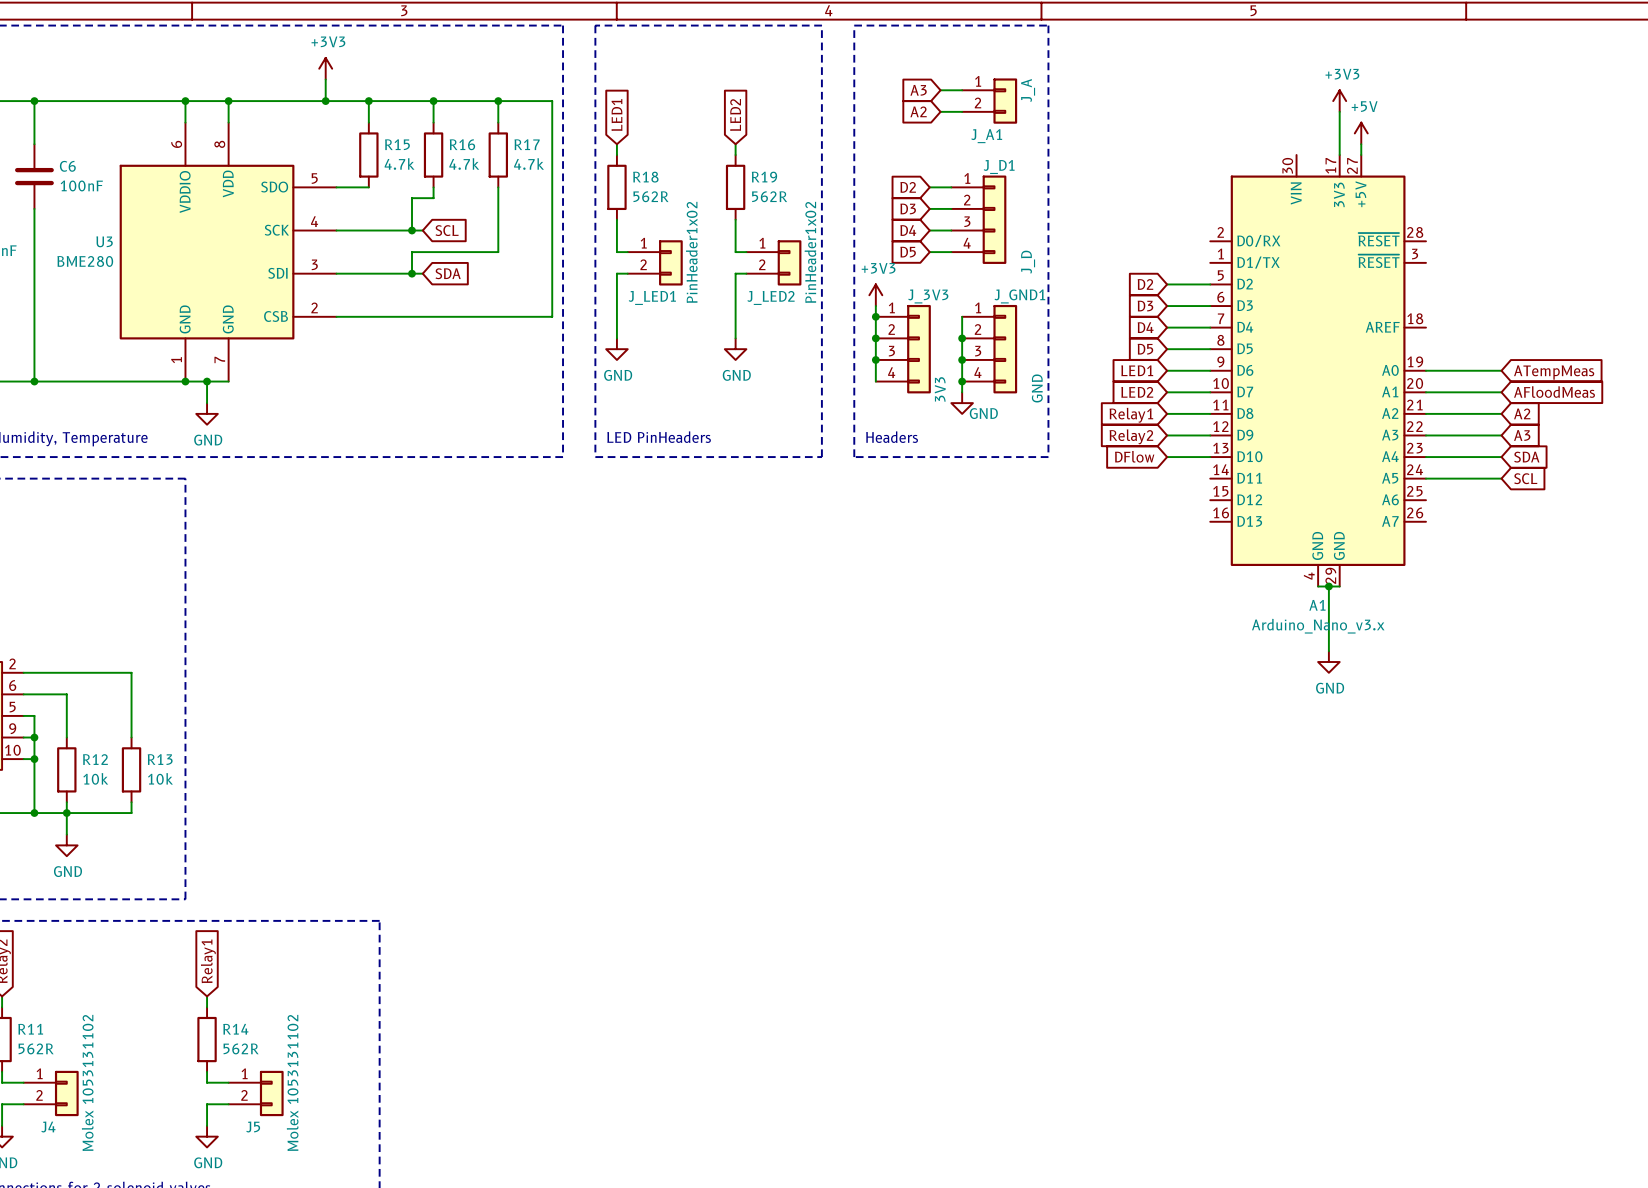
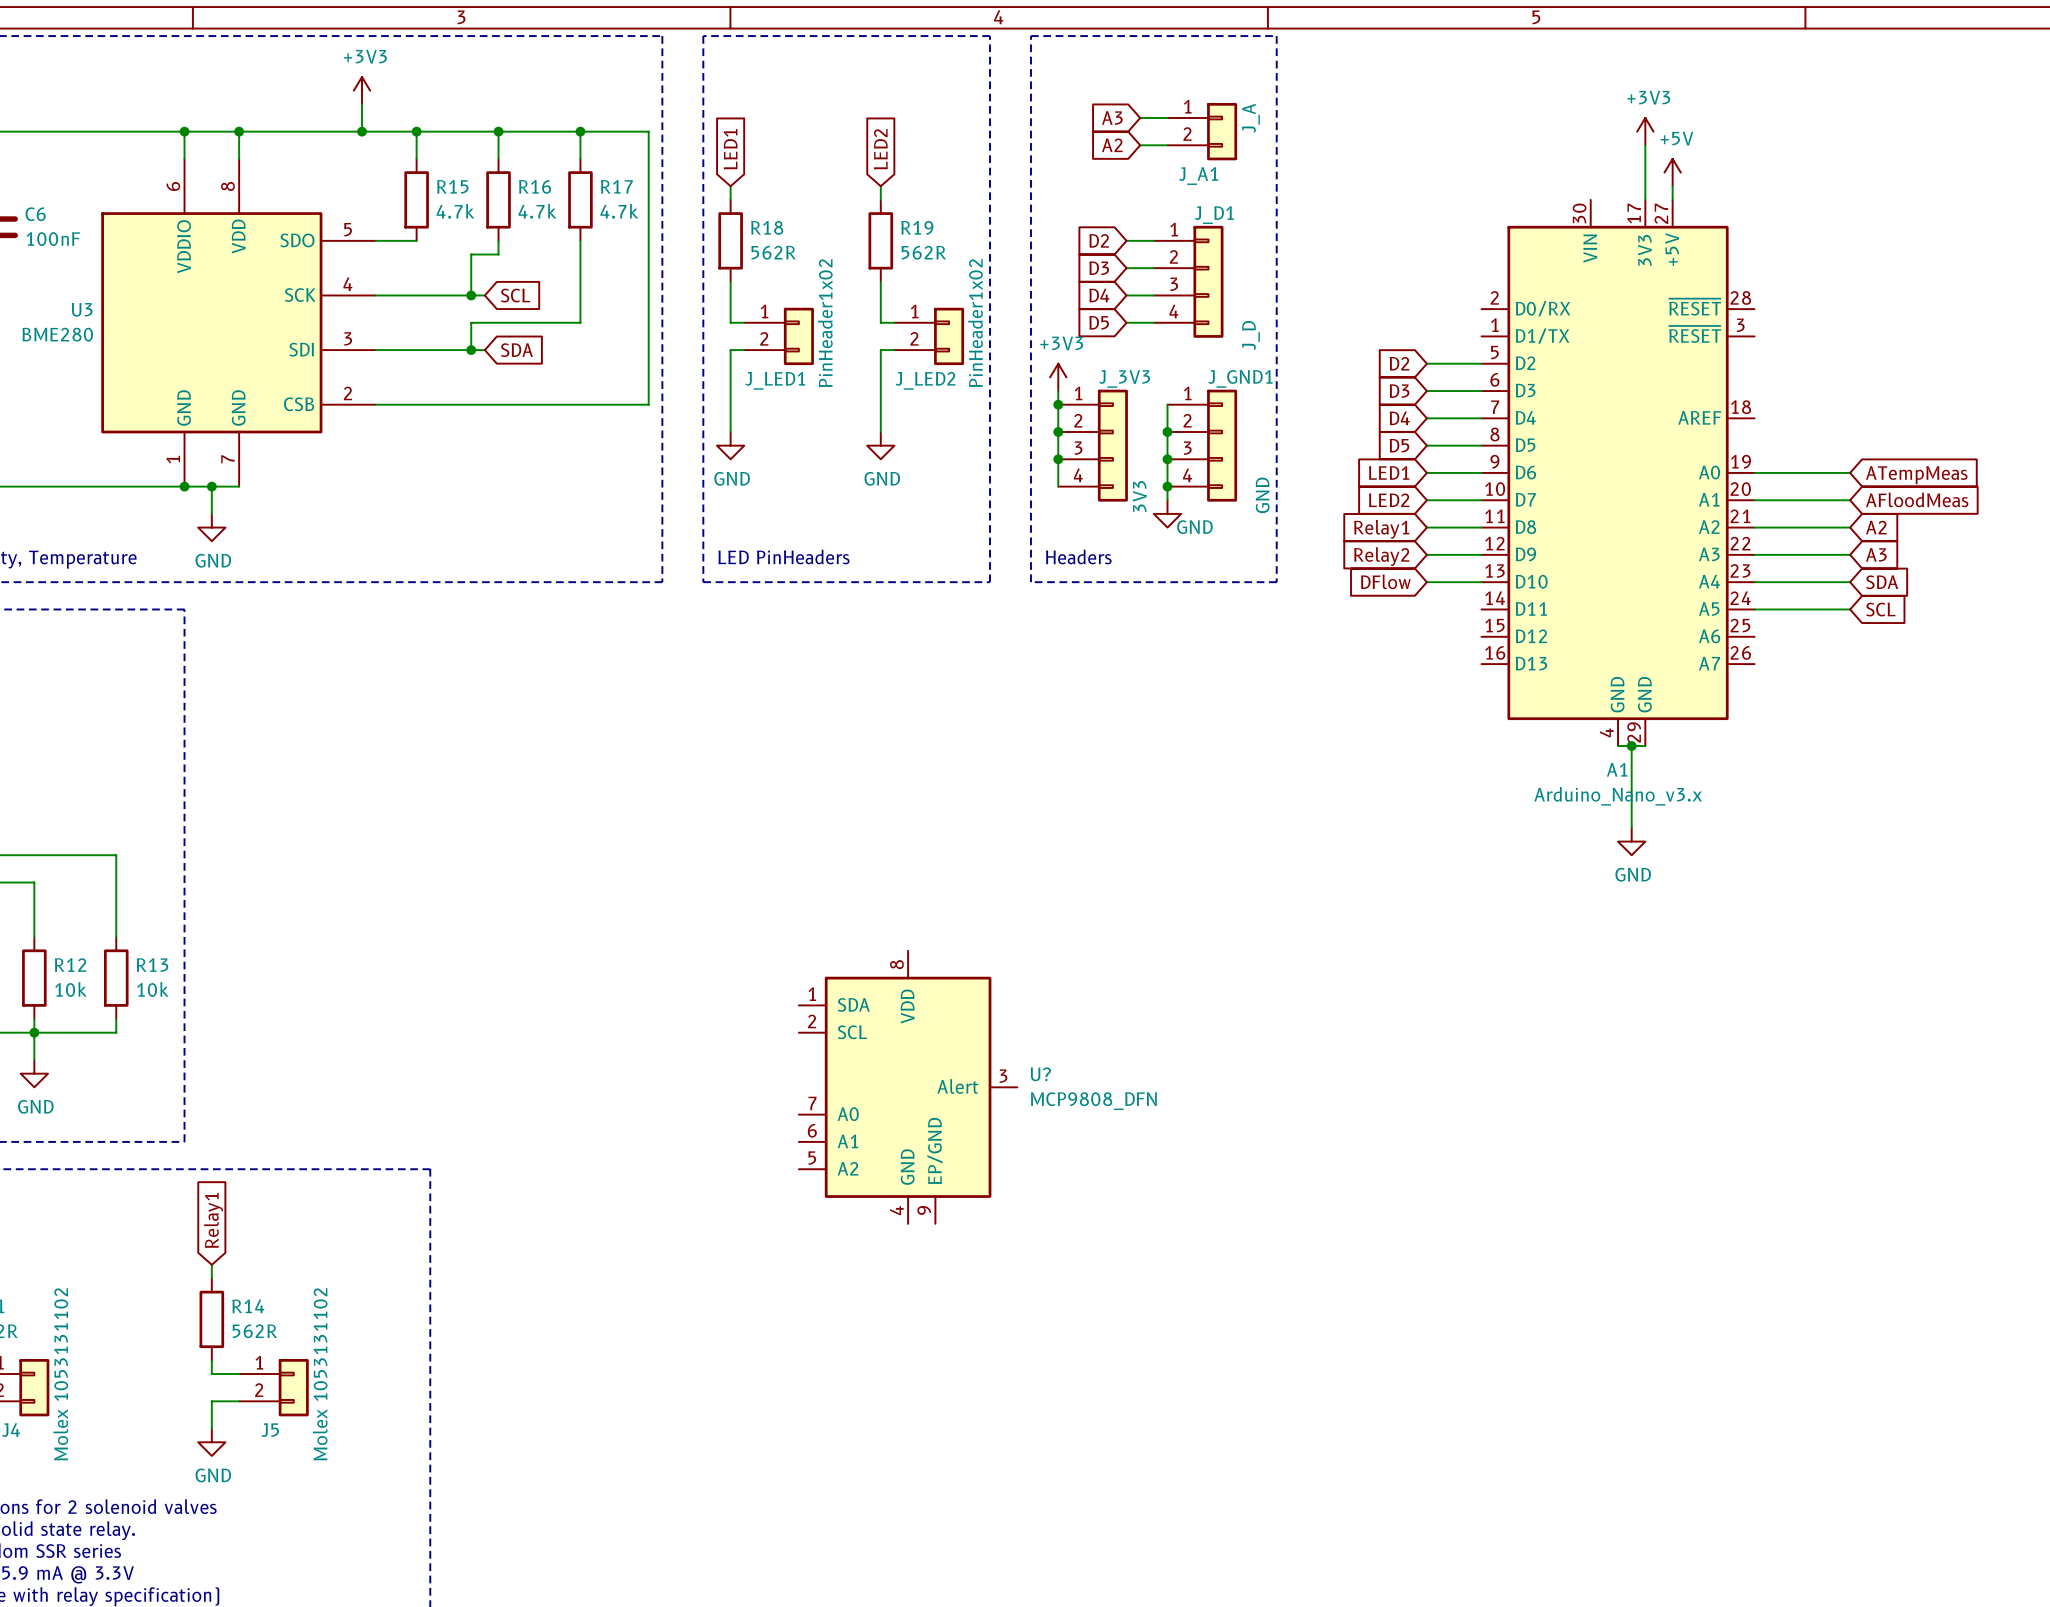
U?: none -> MCP9808_DFN (908, 1087)

